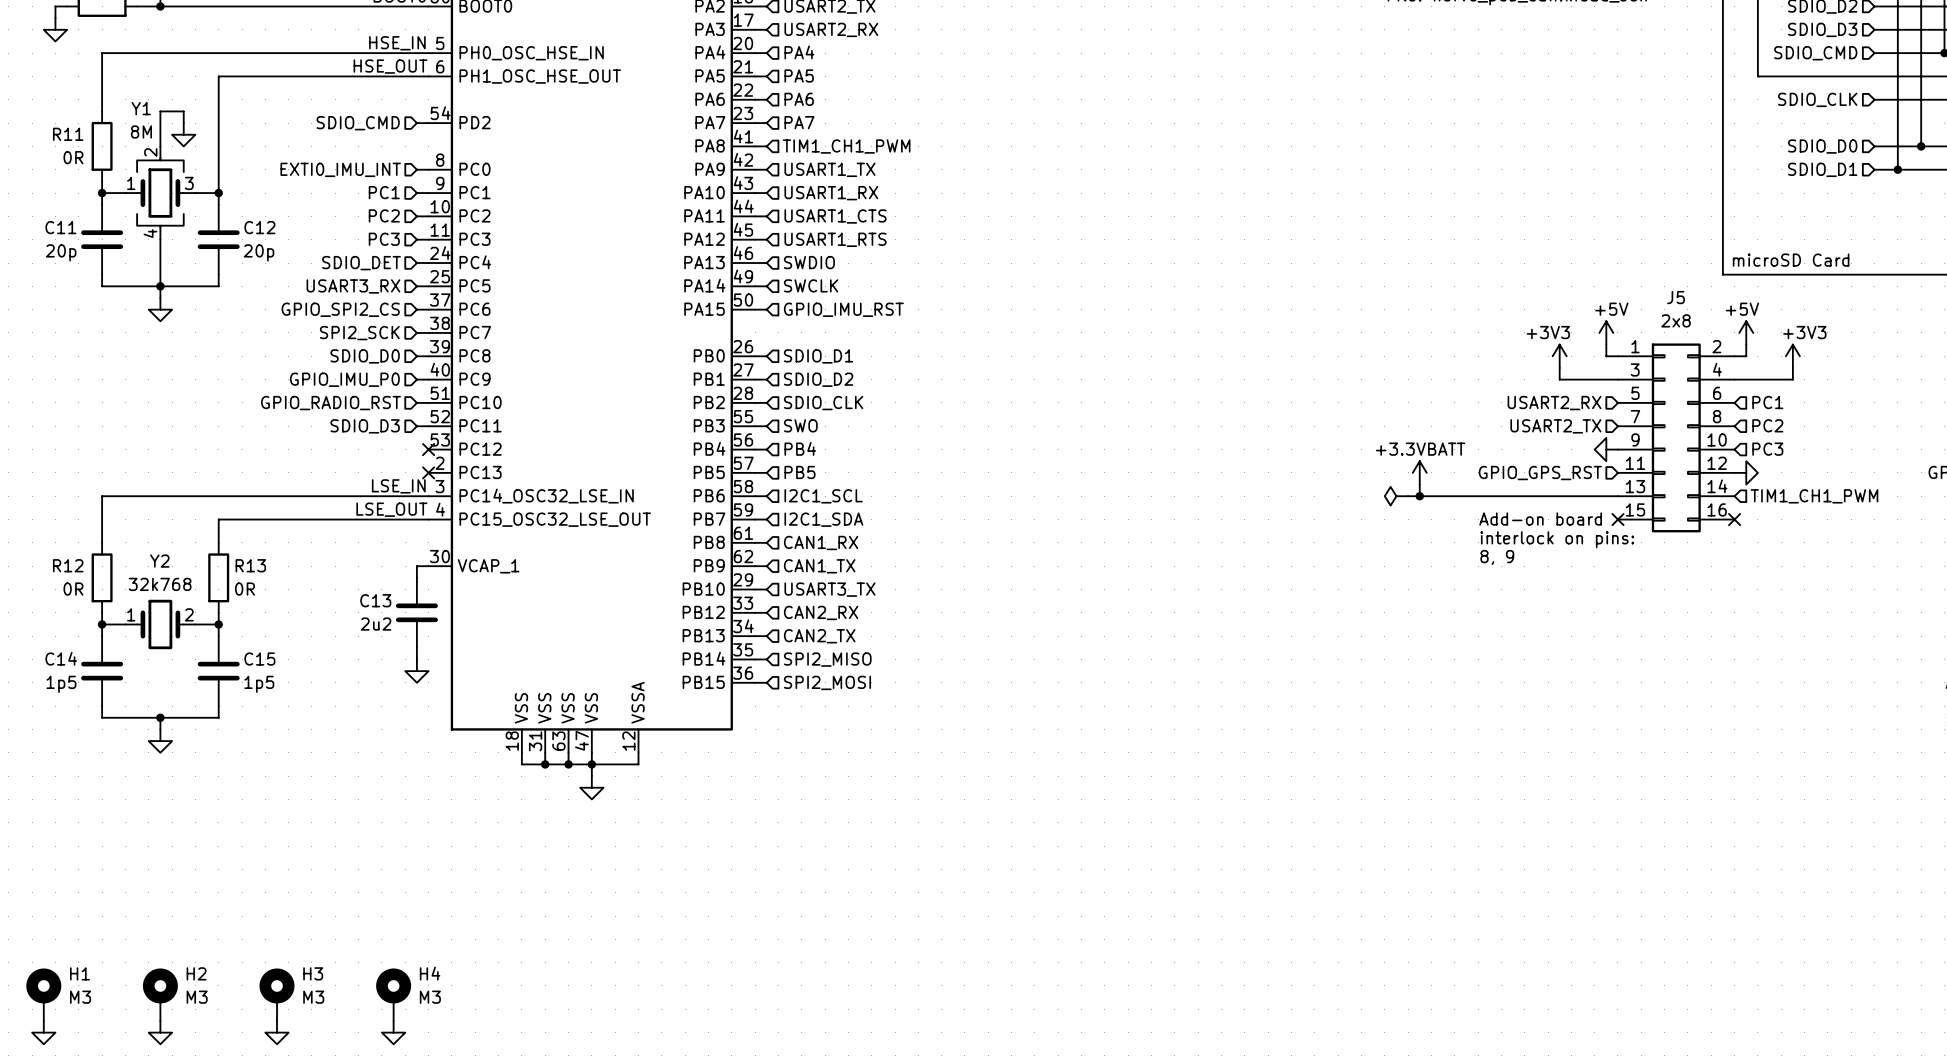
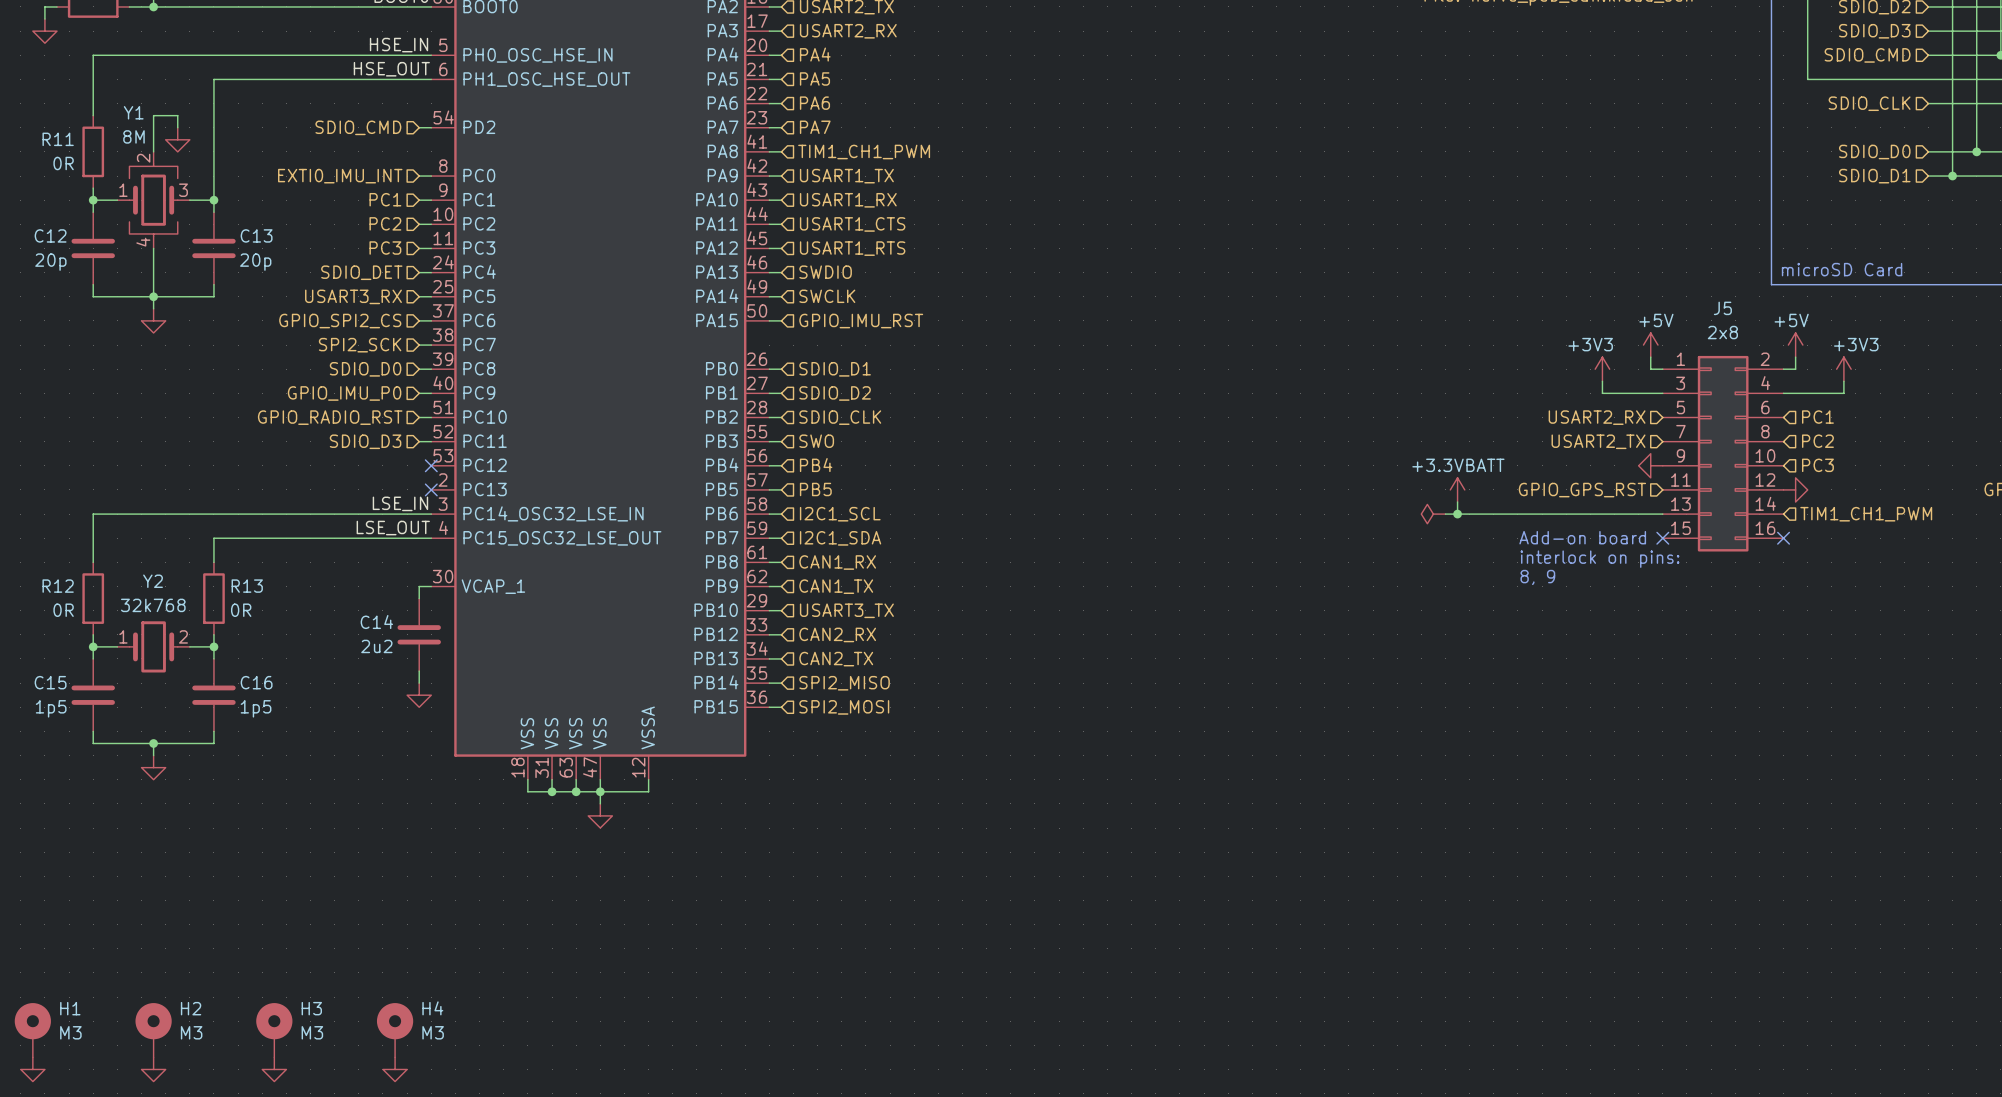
C11 name: C11 (60, 227) -> C12 (50, 235)
C12 name: C12 (259, 227) -> C13 (256, 235)
C13 name: C13 (375, 600) -> C14 (376, 622)
C14 name: C14 (61, 658) -> C15 (50, 682)
C15 name: C15 (259, 659) -> C16 (256, 682)

